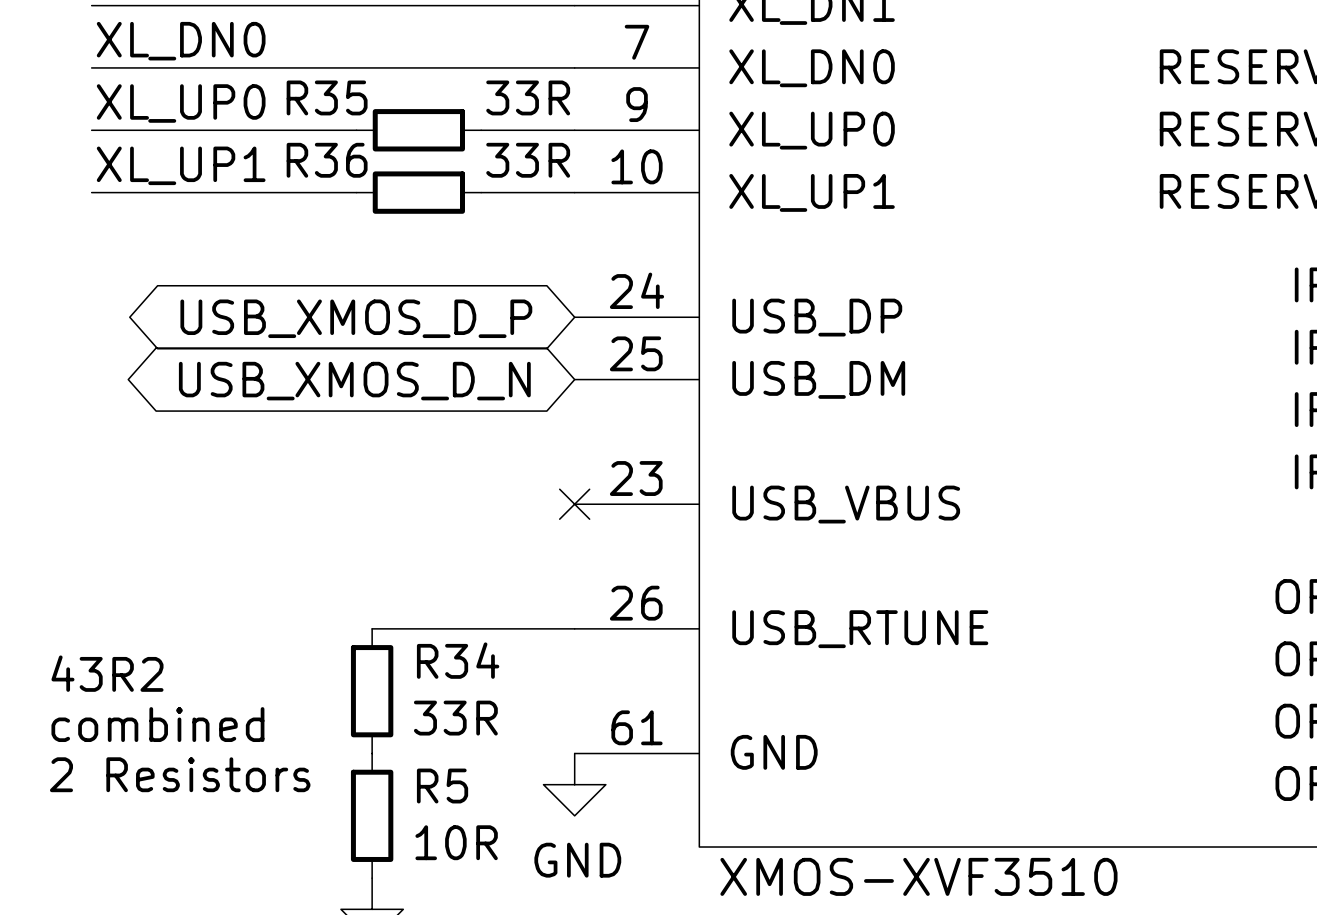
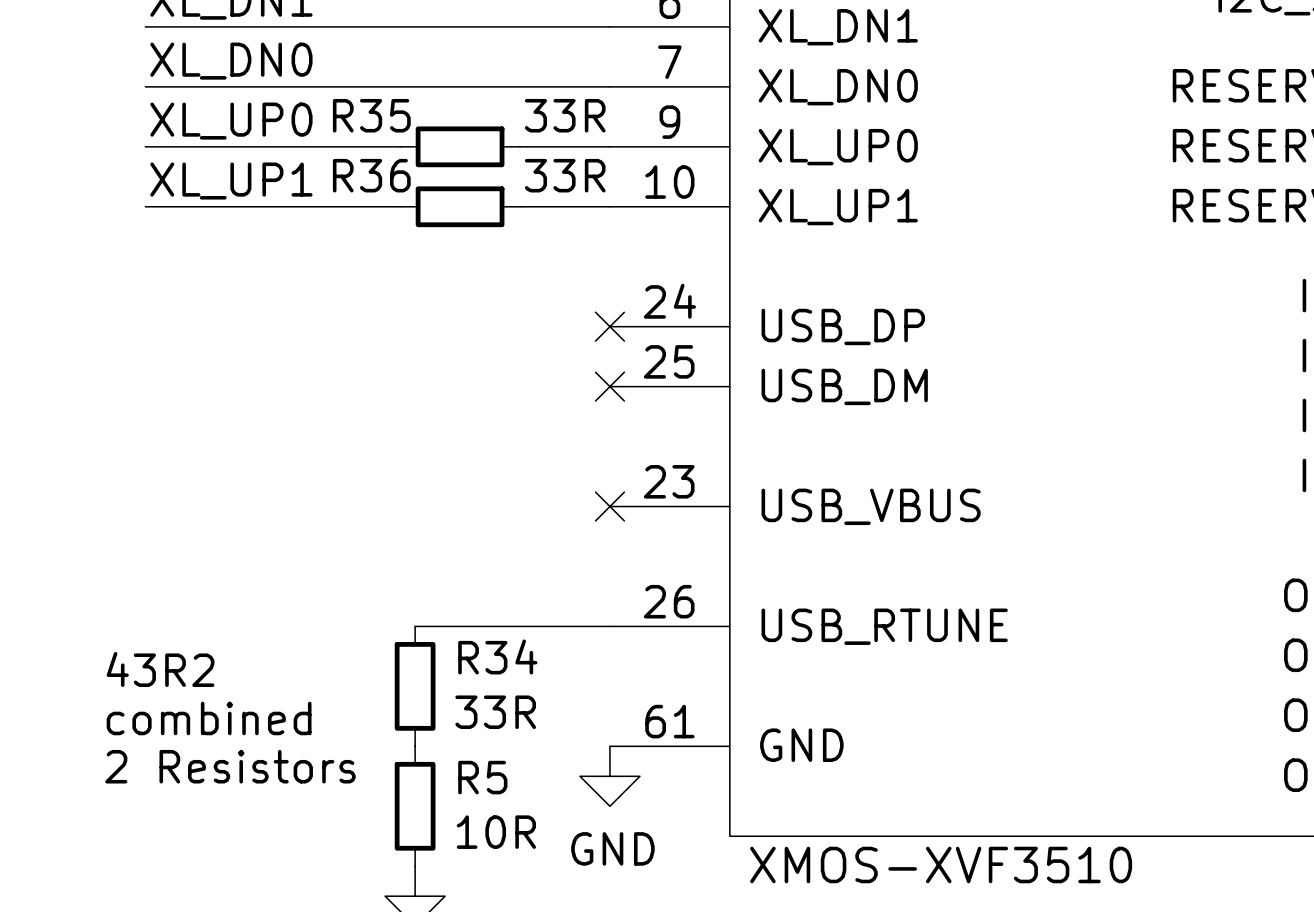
no-connect mark: none -> (609, 326)
global label: USB_XMOS_D_P (356, 318) -> none
no-connect mark: none -> (609, 386)
global label: USB_XMOS_D_N (354, 381) -> none

